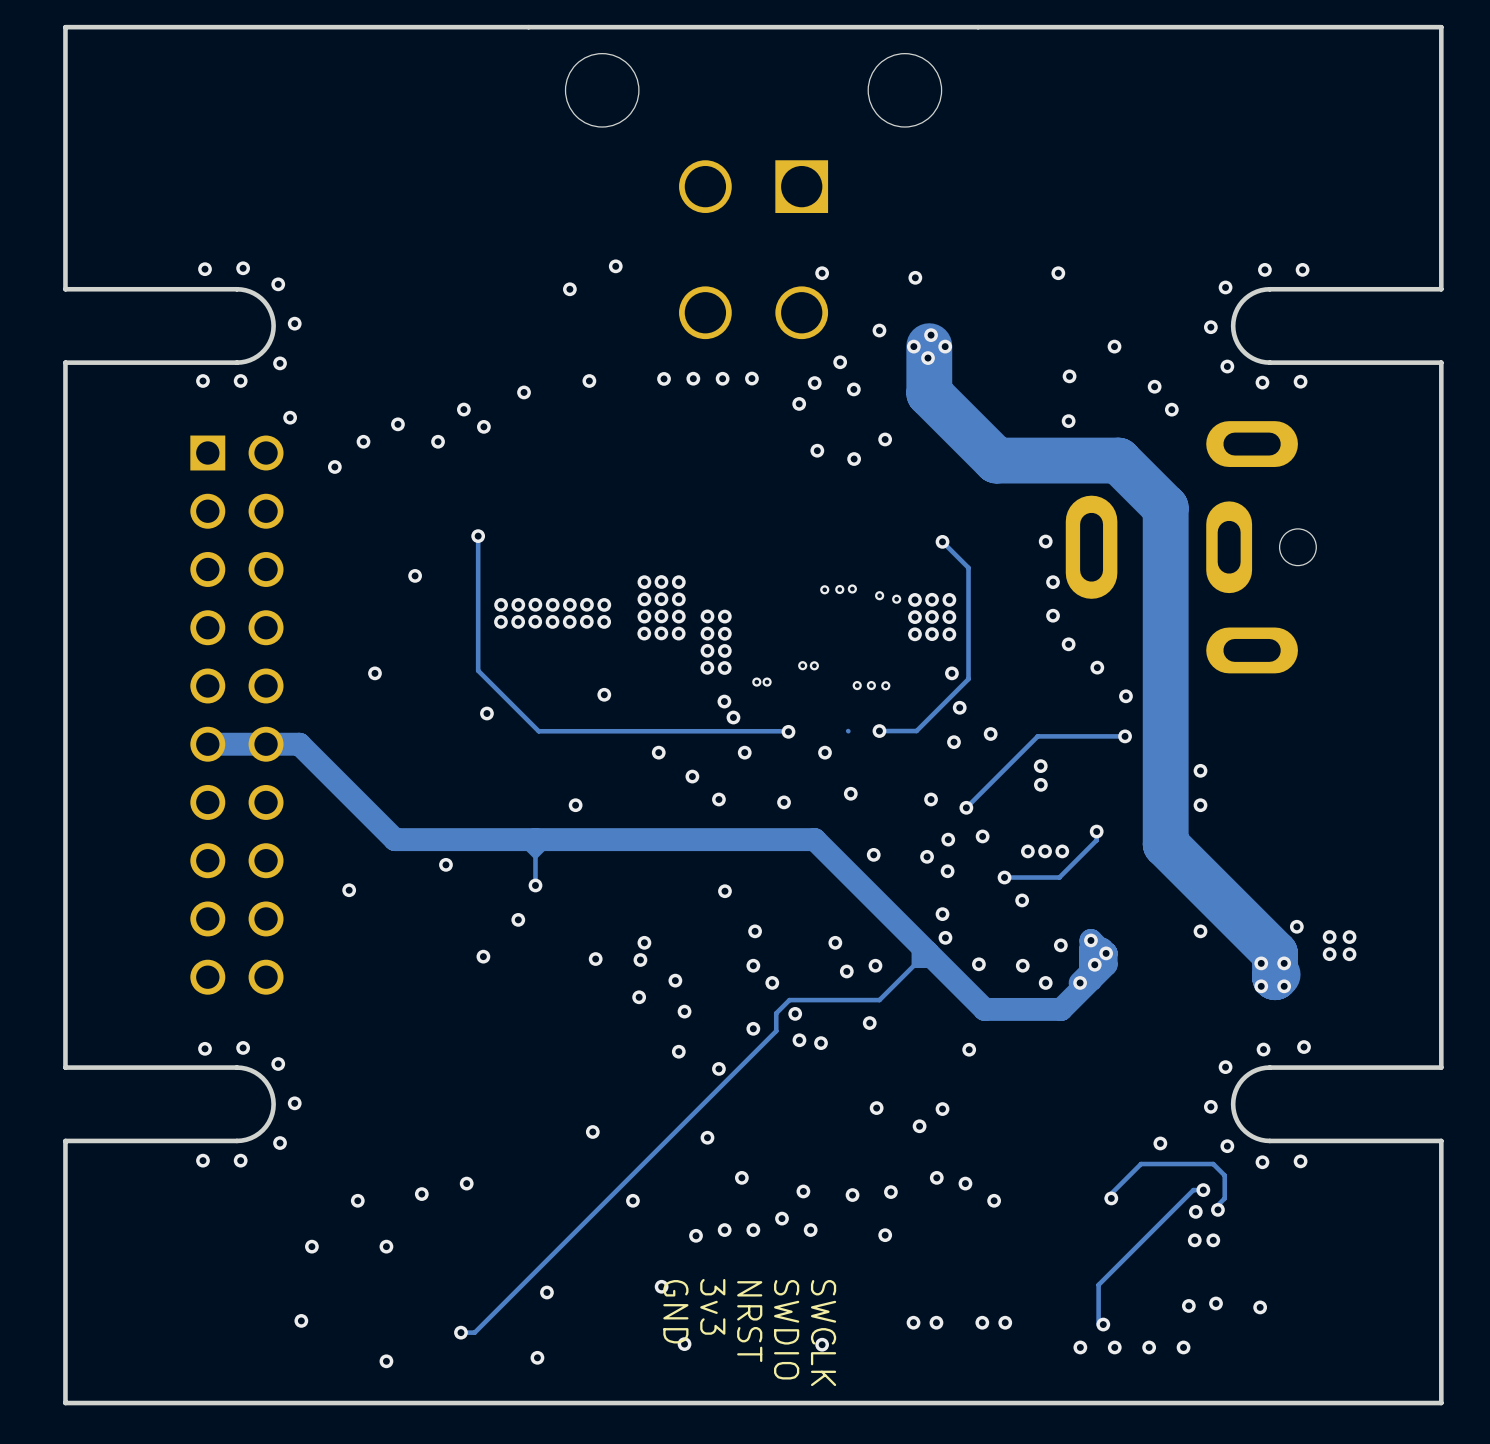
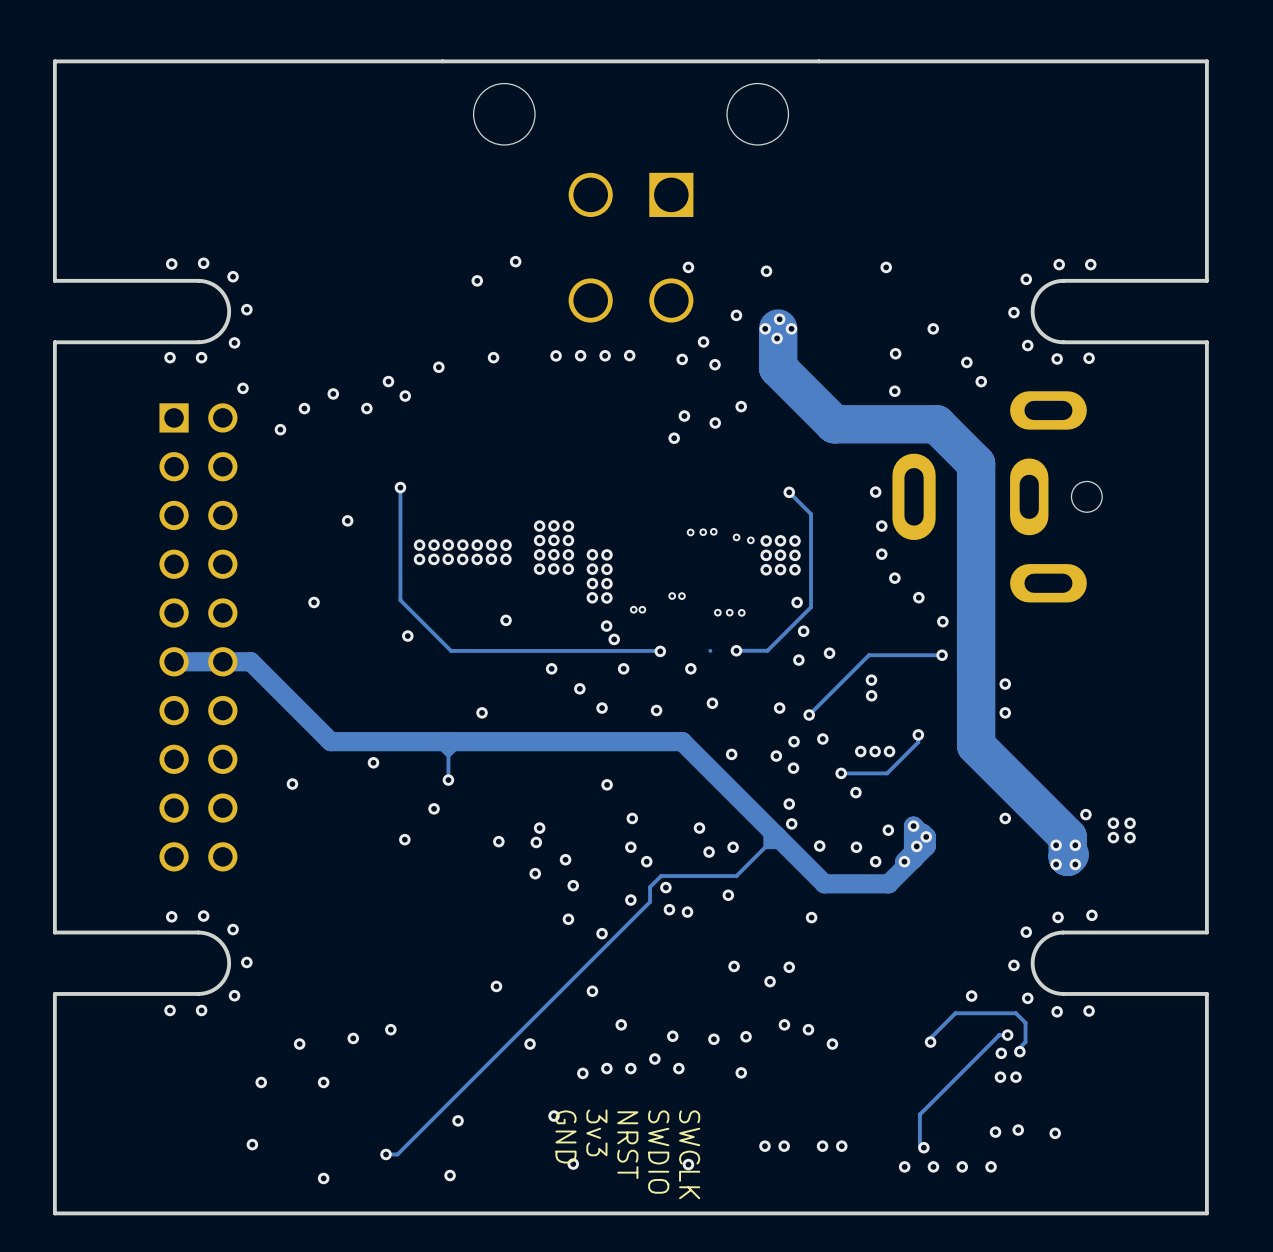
via position: (799, 403) -> (674, 438)

